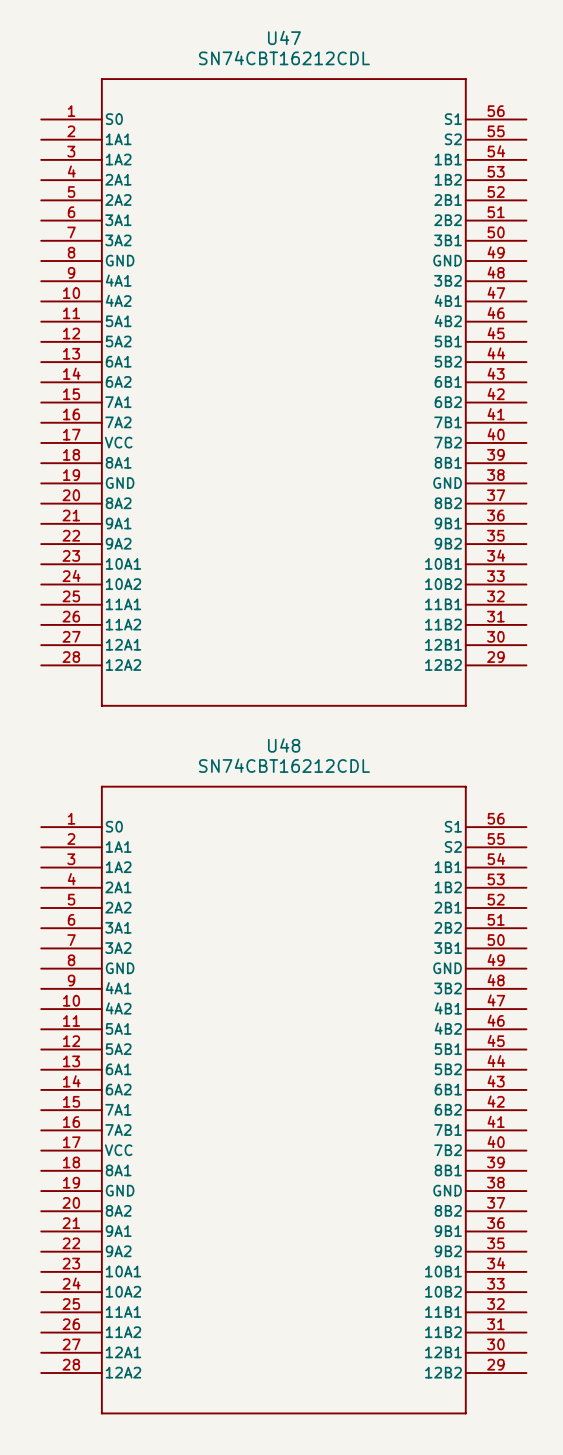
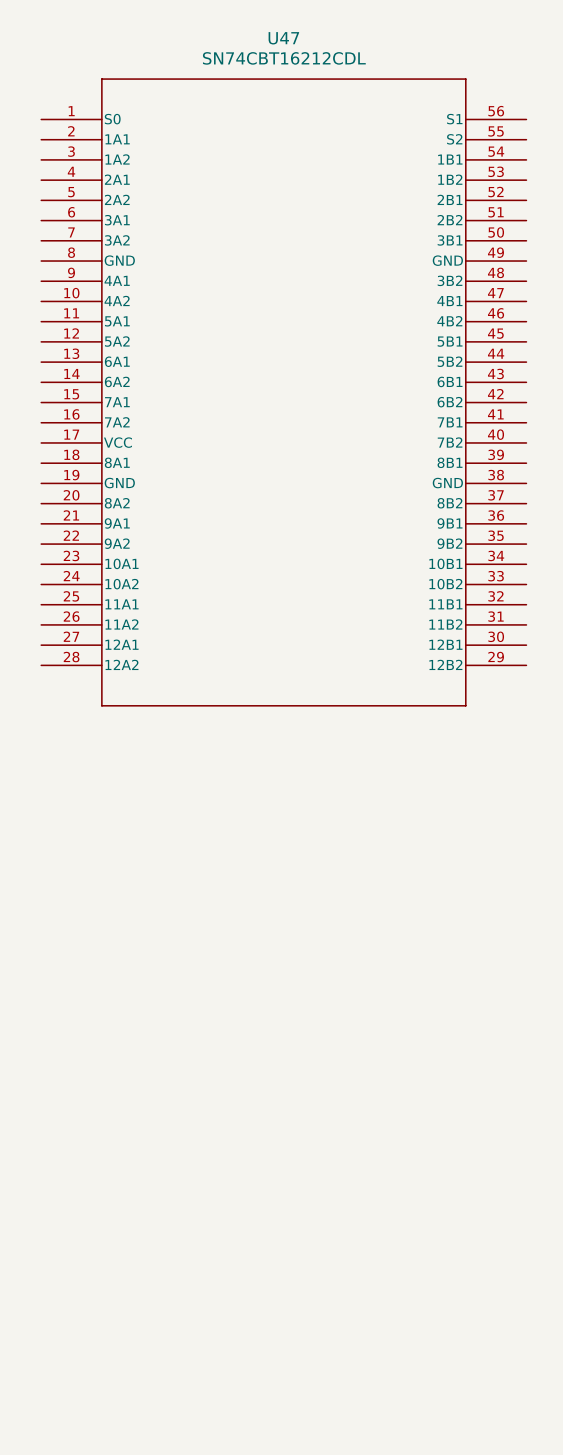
U48: SN74CBT16212CDL (283, 1100) -> none

